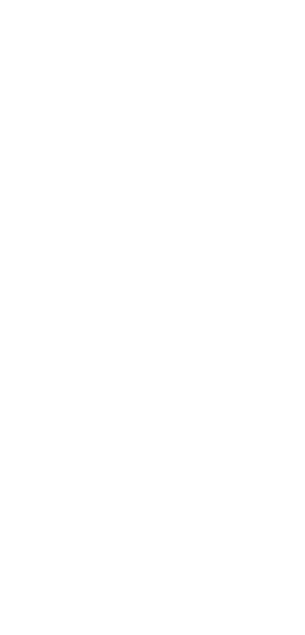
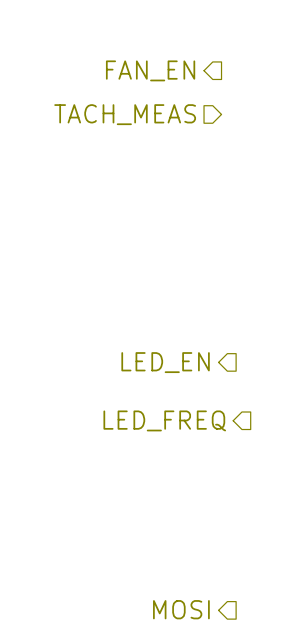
hierarchical label: none -> FAN_EN (150, 70)
hierarchical label: none -> TACH_MEAS (125, 114)
hierarchical label: none -> LED_EN (165, 362)
hierarchical label: none -> LED_FREQ (164, 420)
hierarchical label: none -> MOSI (181, 609)

